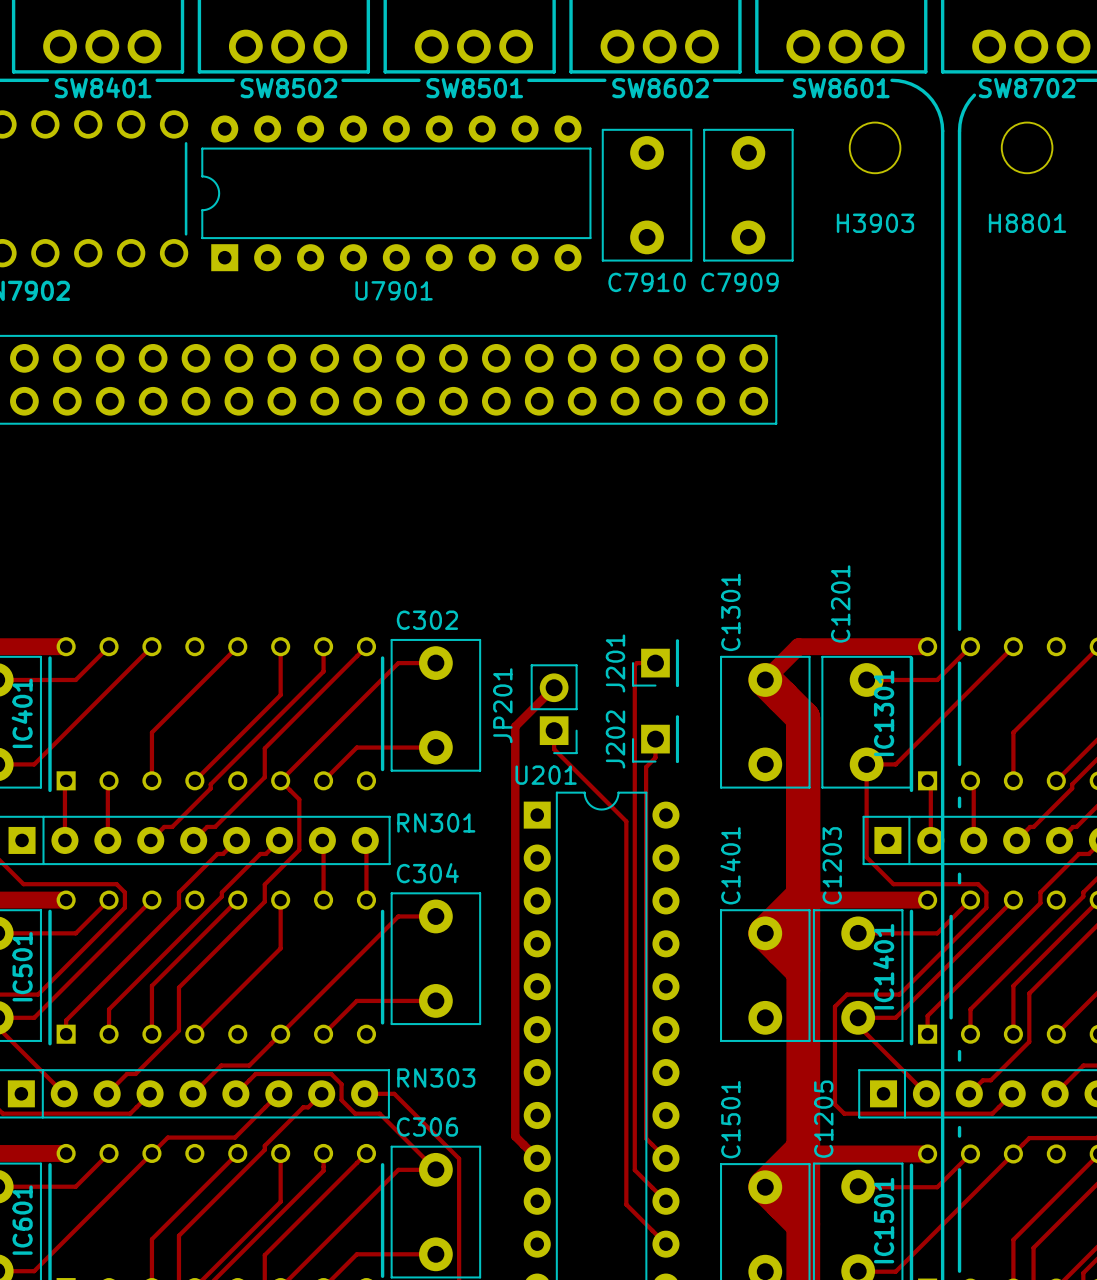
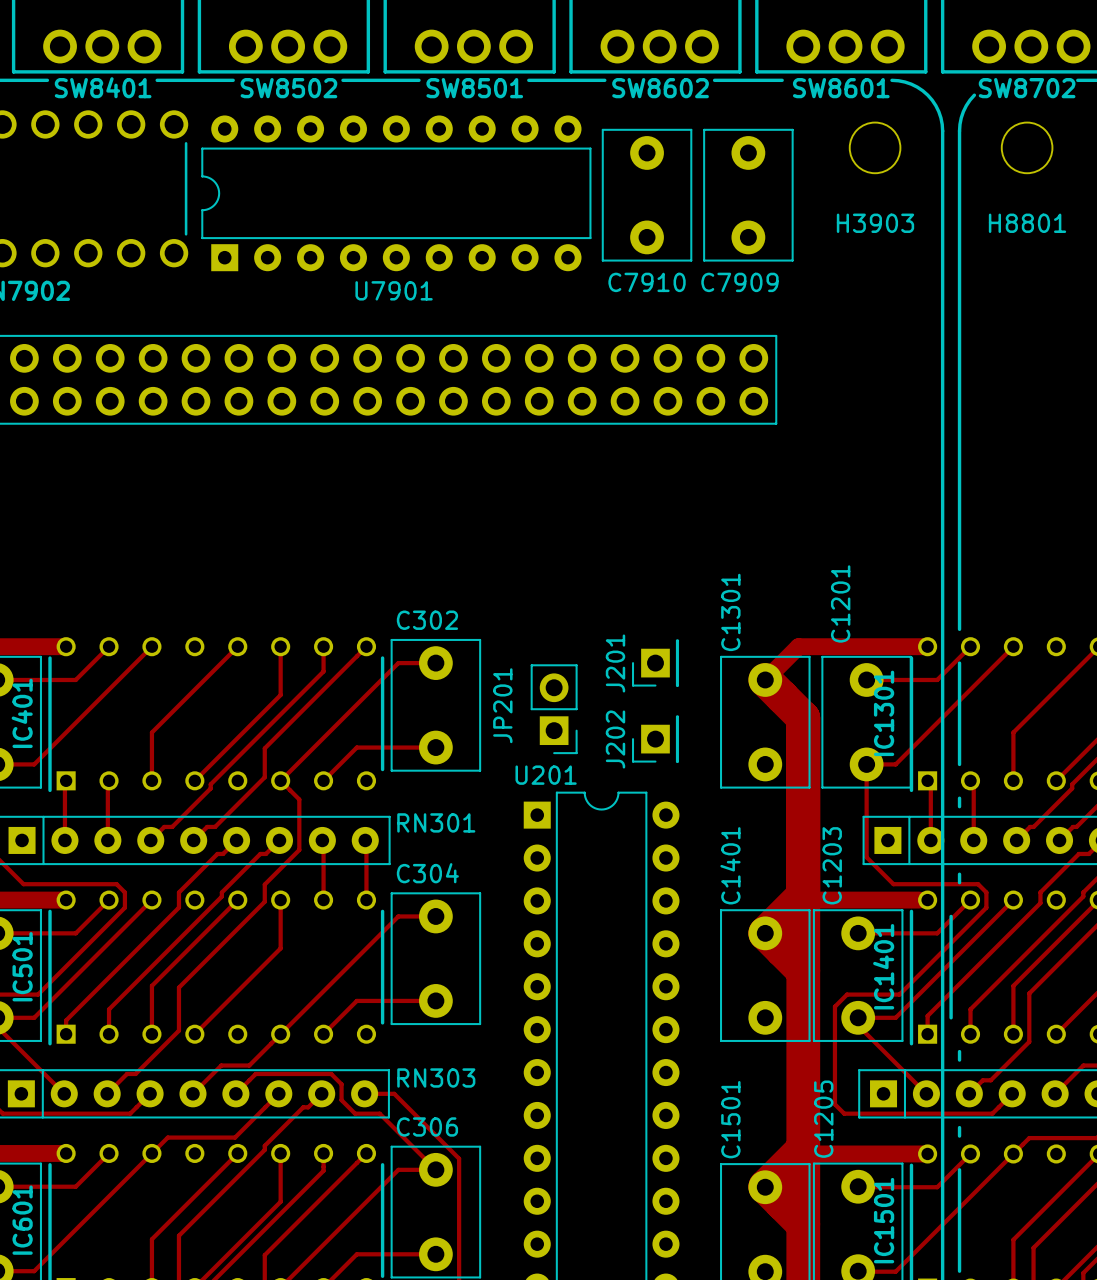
track: (655, 663) (636, 663) (634, 665) (634, 1170) (665, 1201) -> none
track: (554, 687) (515, 726) (515, 1136) (537, 1158) -> none
track: (554, 730) (554, 749) (626, 821) (626, 1204) (665, 1244) -> none
track: (655, 739) (655, 757) (646, 767) (646, 1138) (665, 1158) -> none

